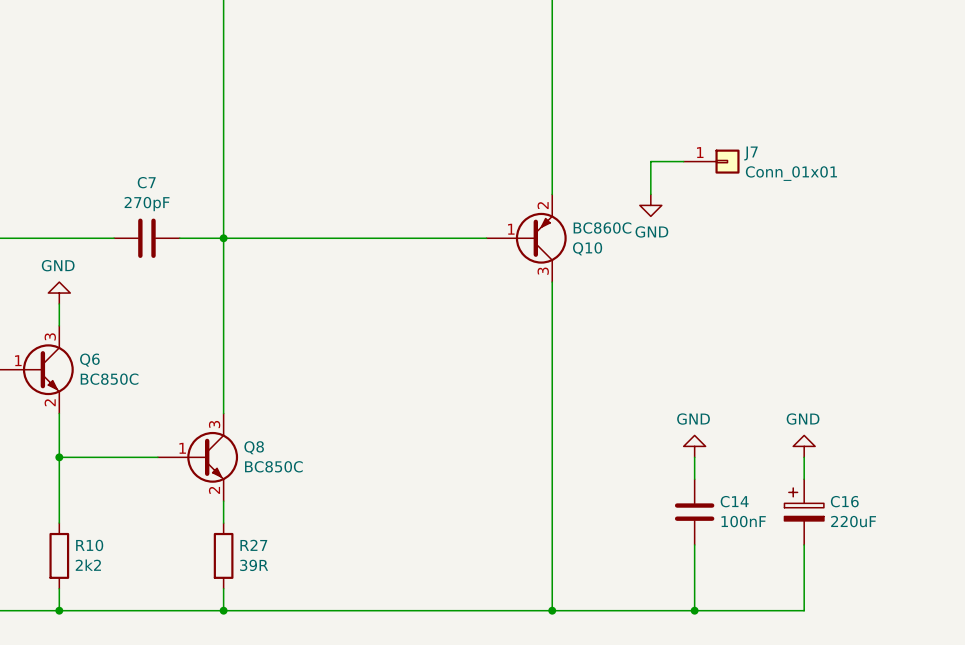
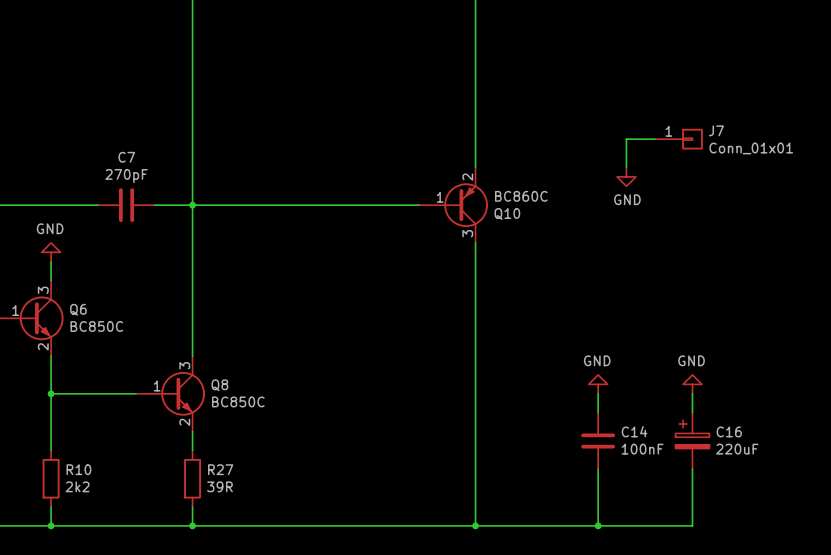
wire: (683, 161) (650, 161) (650, 194) -> (654, 139) (626, 139) (626, 167)
J7 position: (711, 161) -> (678, 139)
power symbol position: GND (650, 205) -> GND (626, 176)

